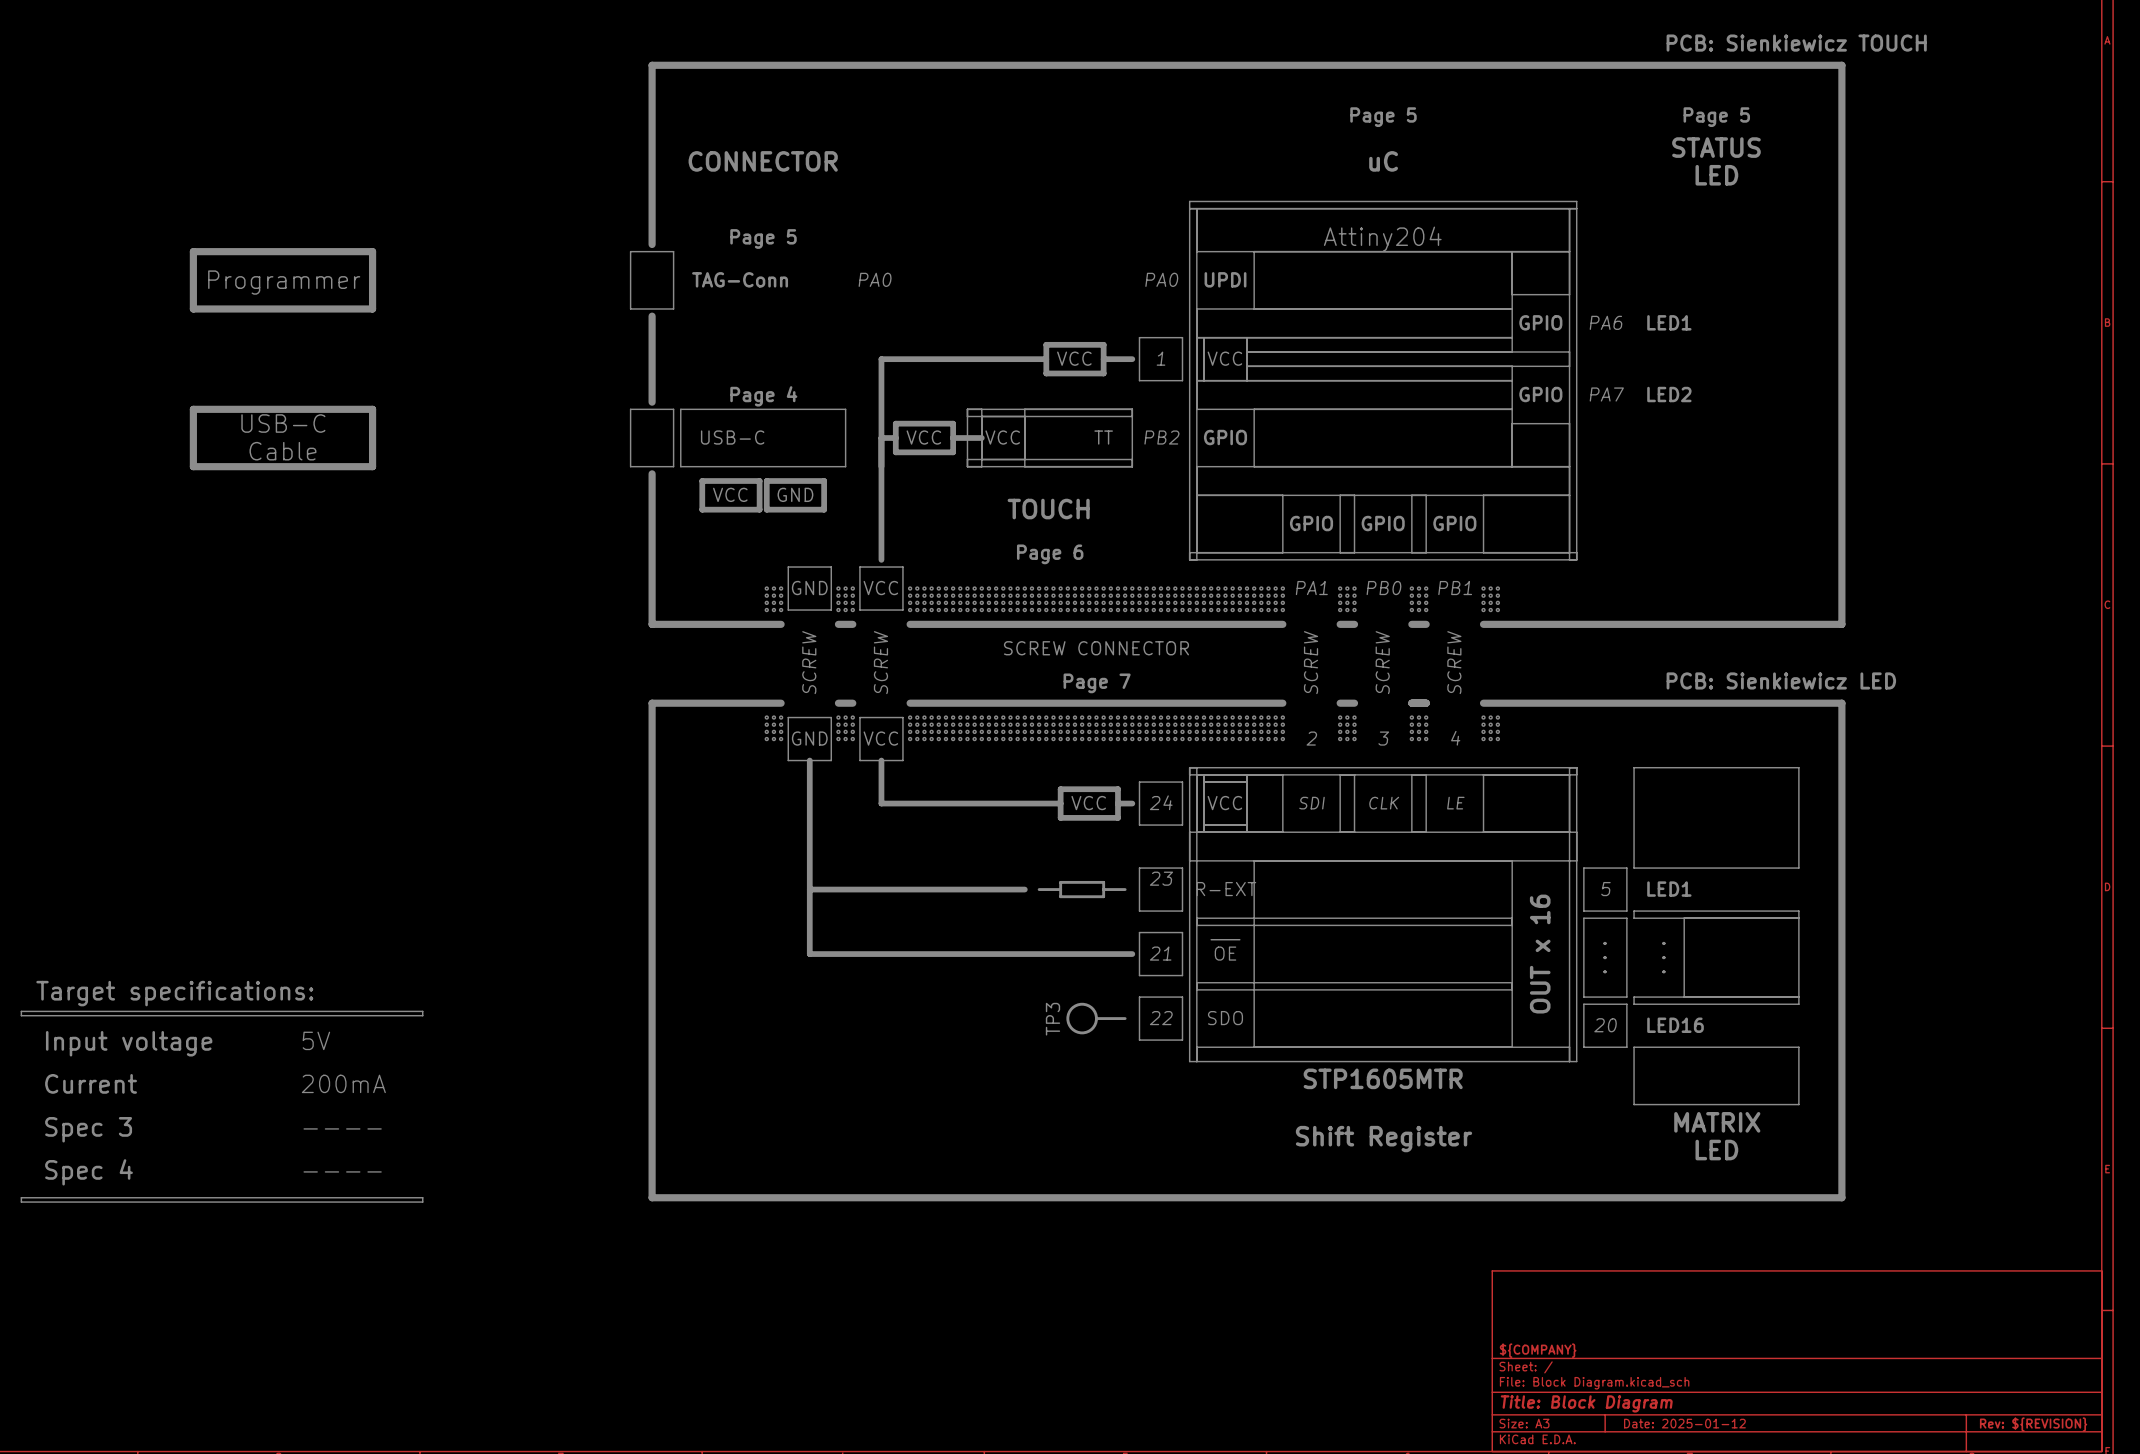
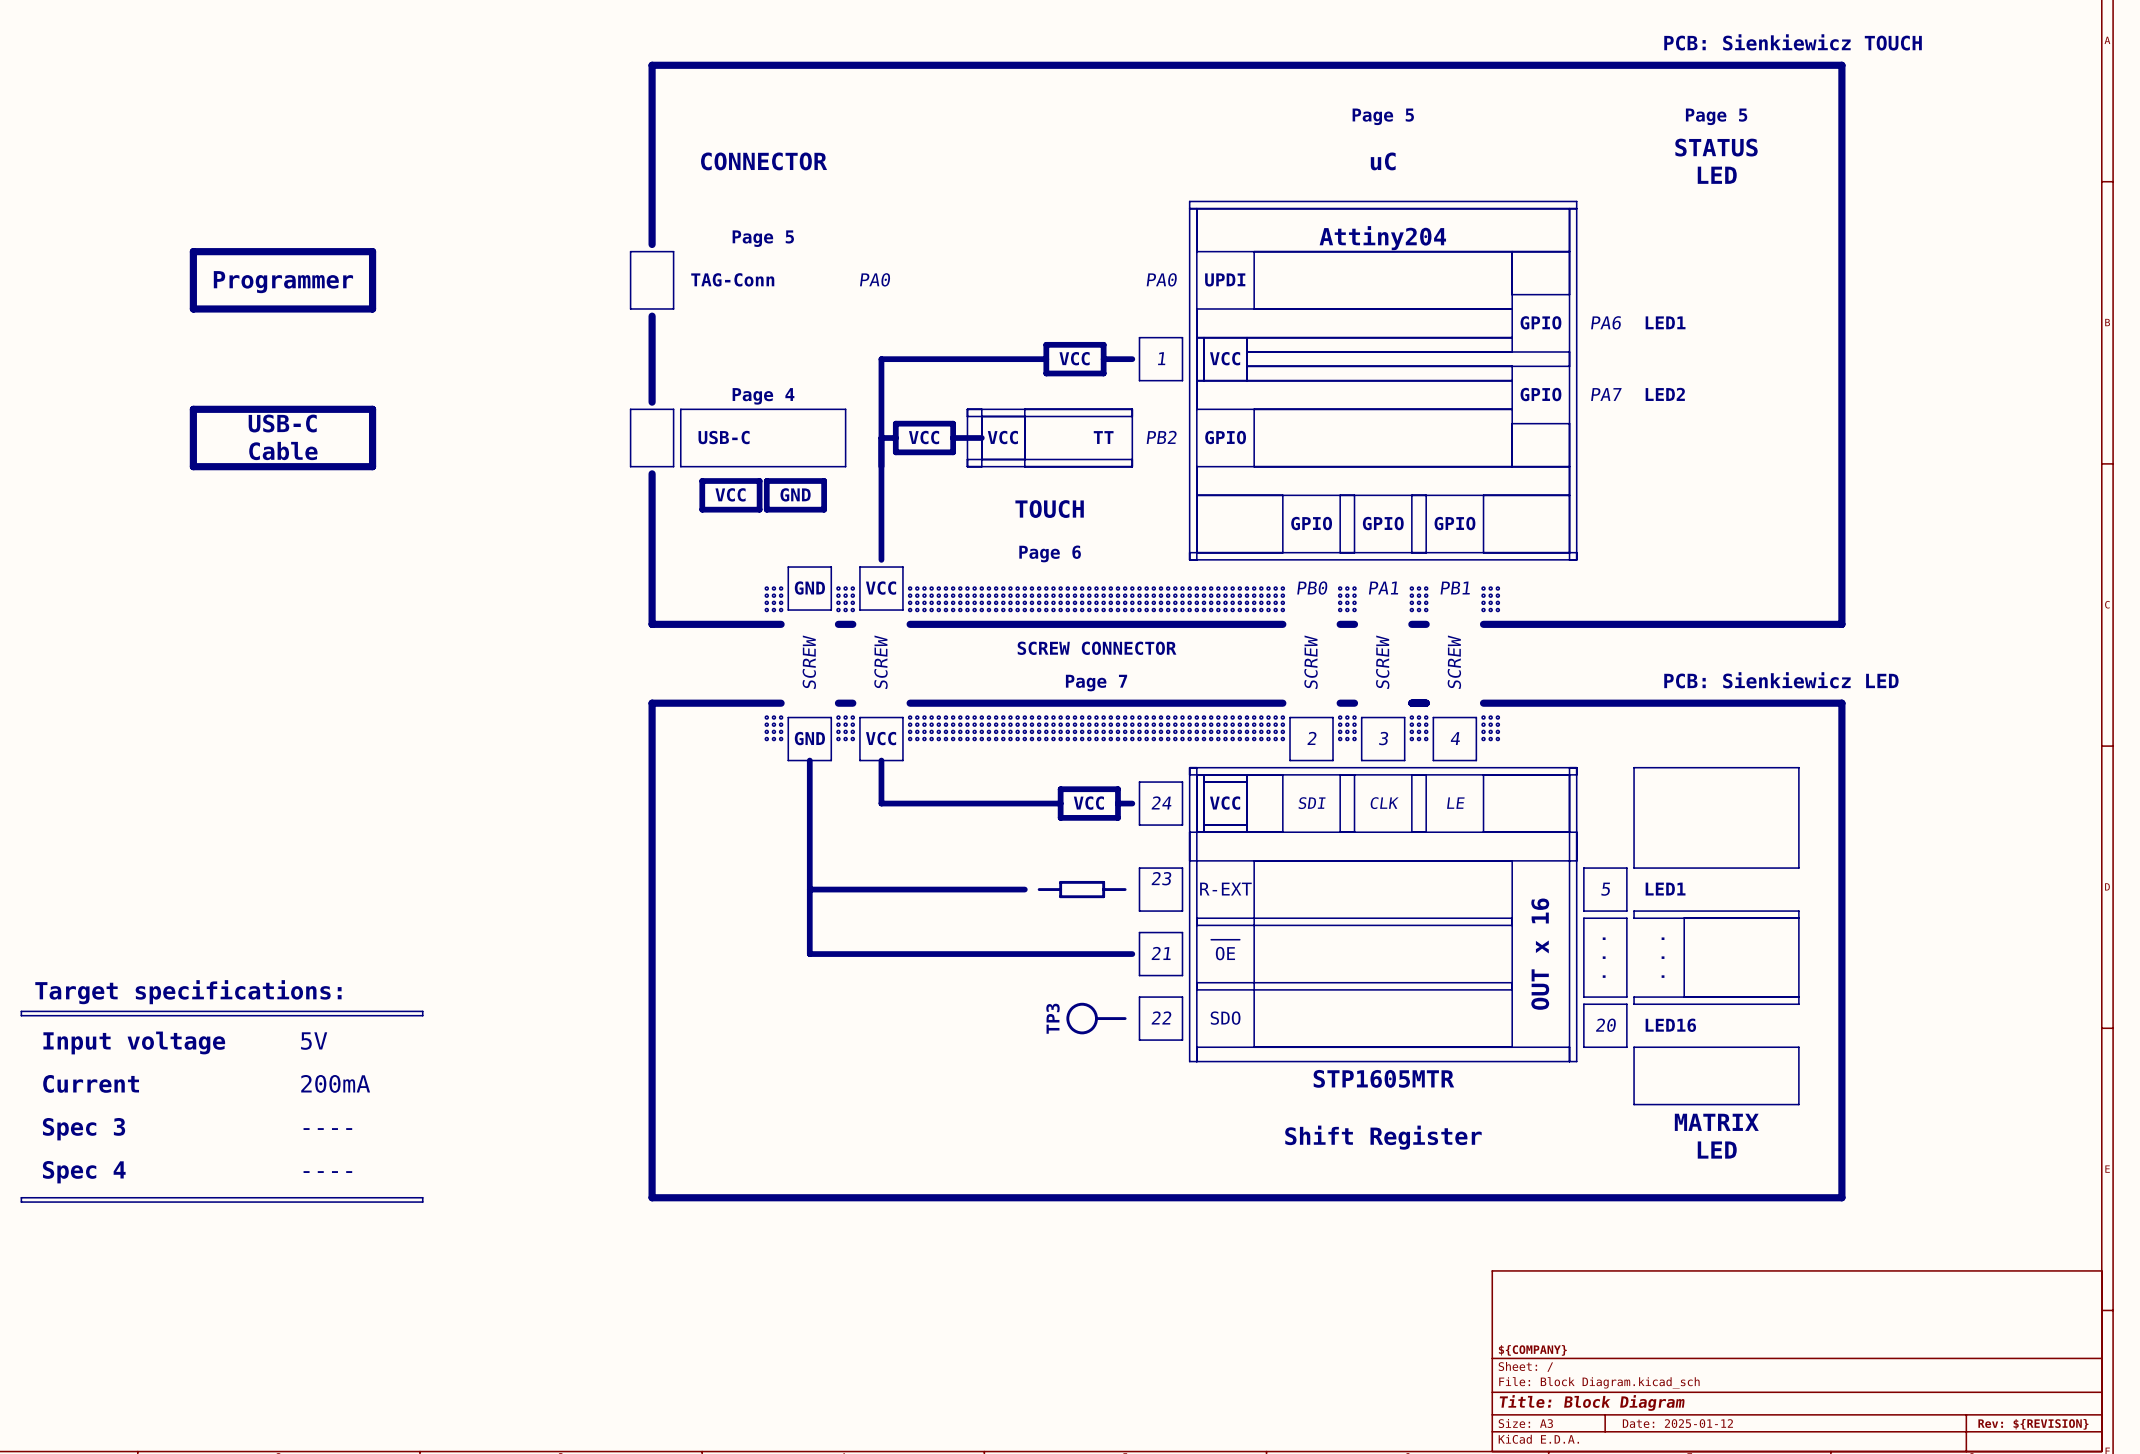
text: PA1 (1311, 588) -> PB0 (1312, 588)
text: PB0 (1383, 588) -> PA1 (1383, 588)
line: none -> (1290, 717) (1333, 717) (1333, 760) (1290, 760) (1290, 717)
line: none -> (1361, 717) (1404, 717) (1404, 760) (1361, 760) (1361, 717)
line: none -> (1433, 717) (1476, 717) (1476, 760) (1433, 760) (1433, 717)

